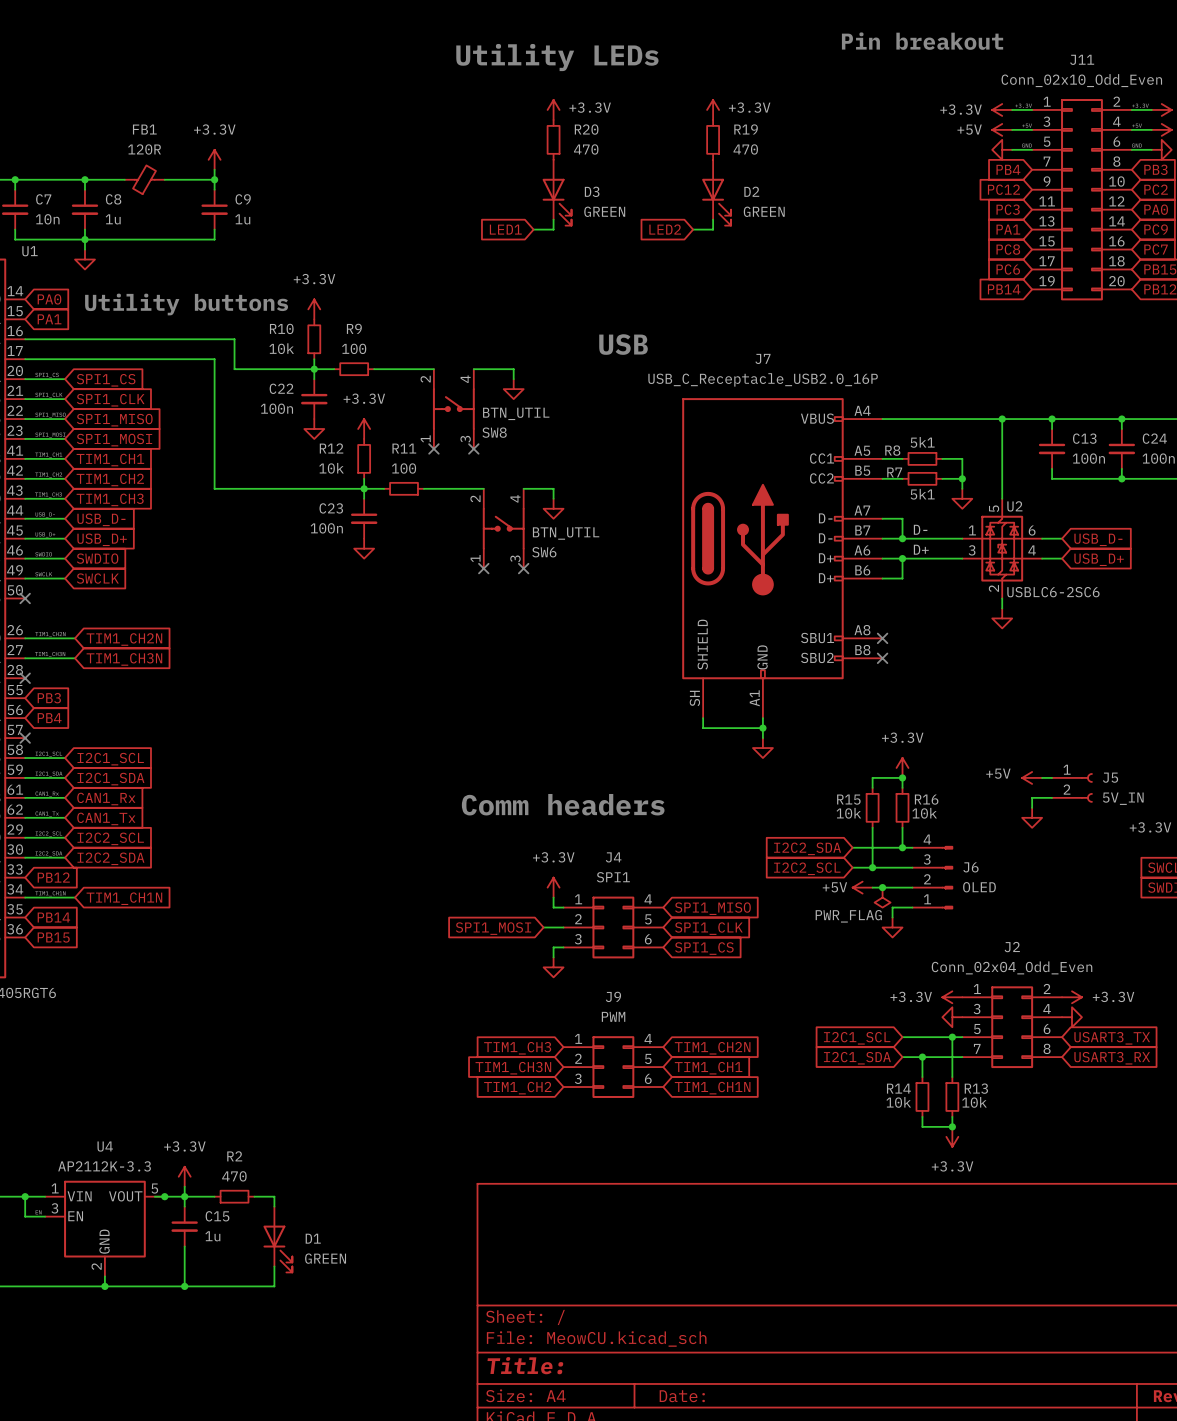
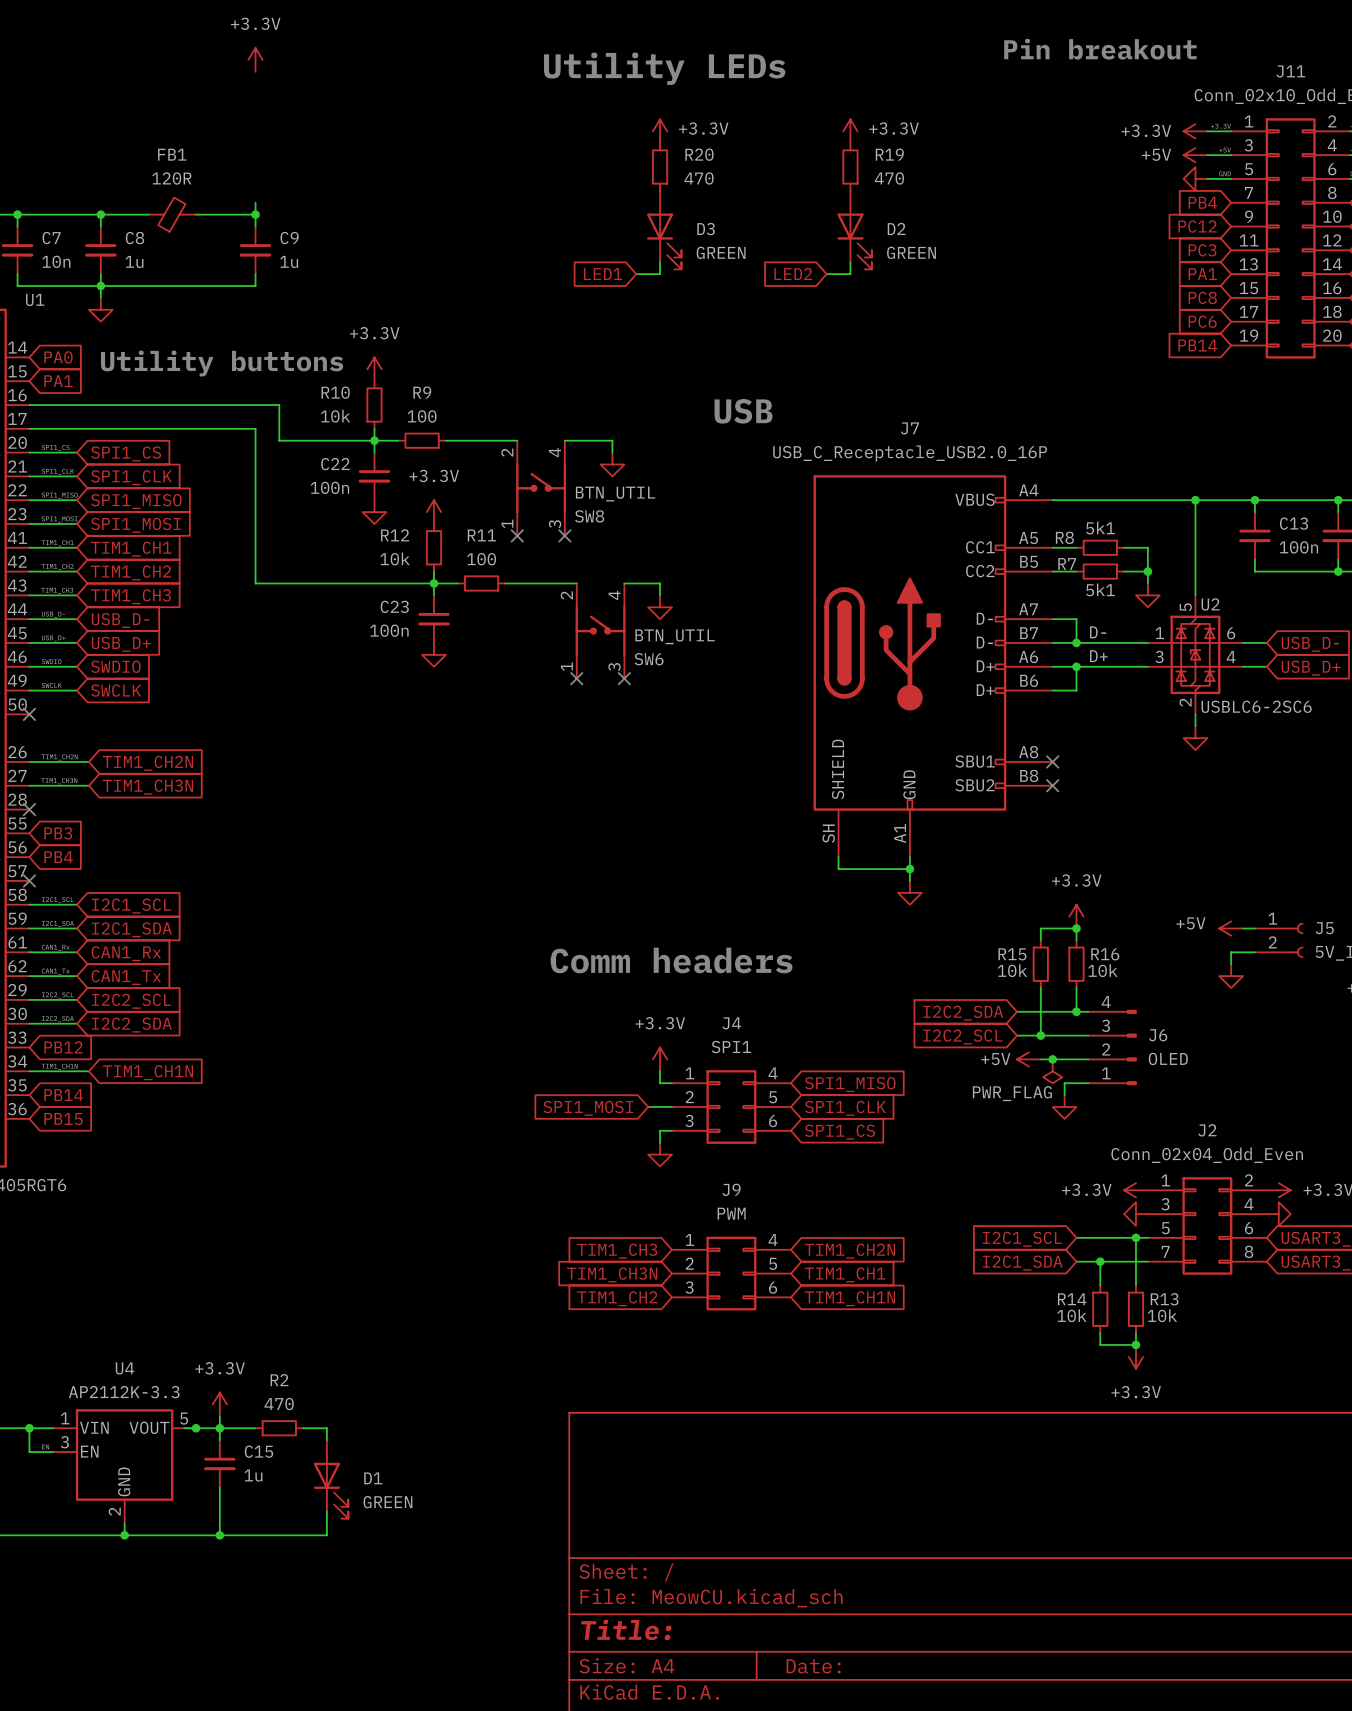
power symbol position: +3.3V (214, 159) -> +3.3V (255, 59)

